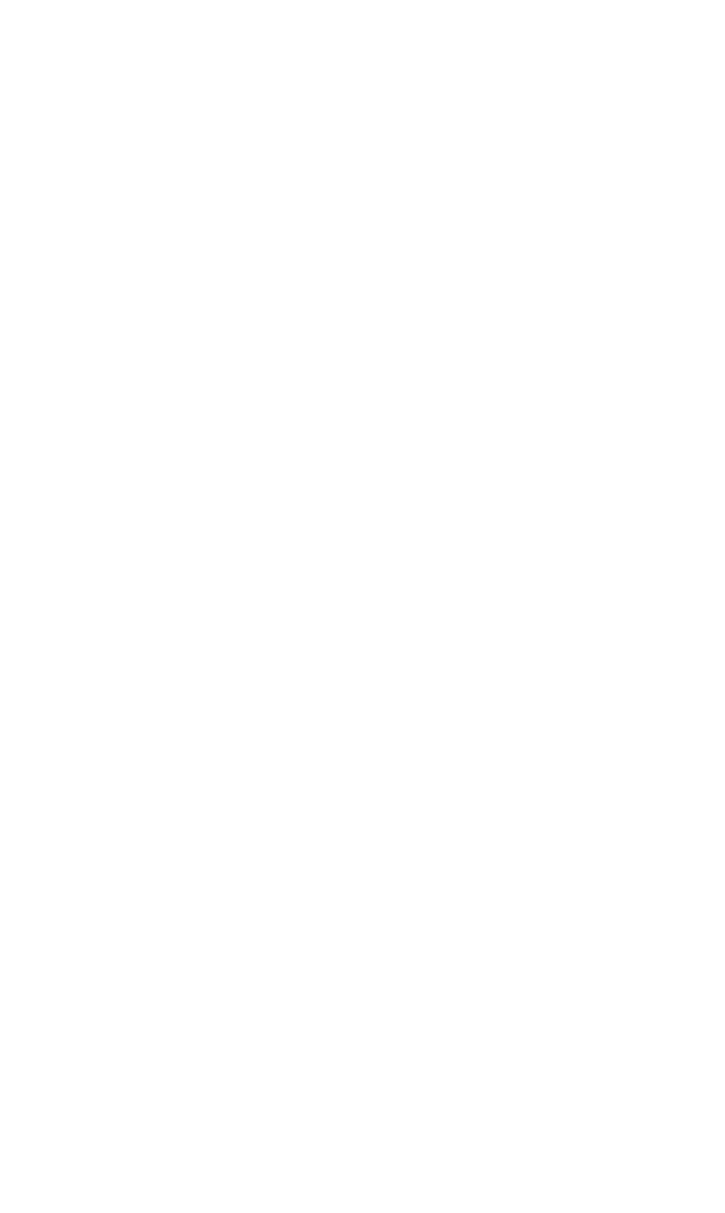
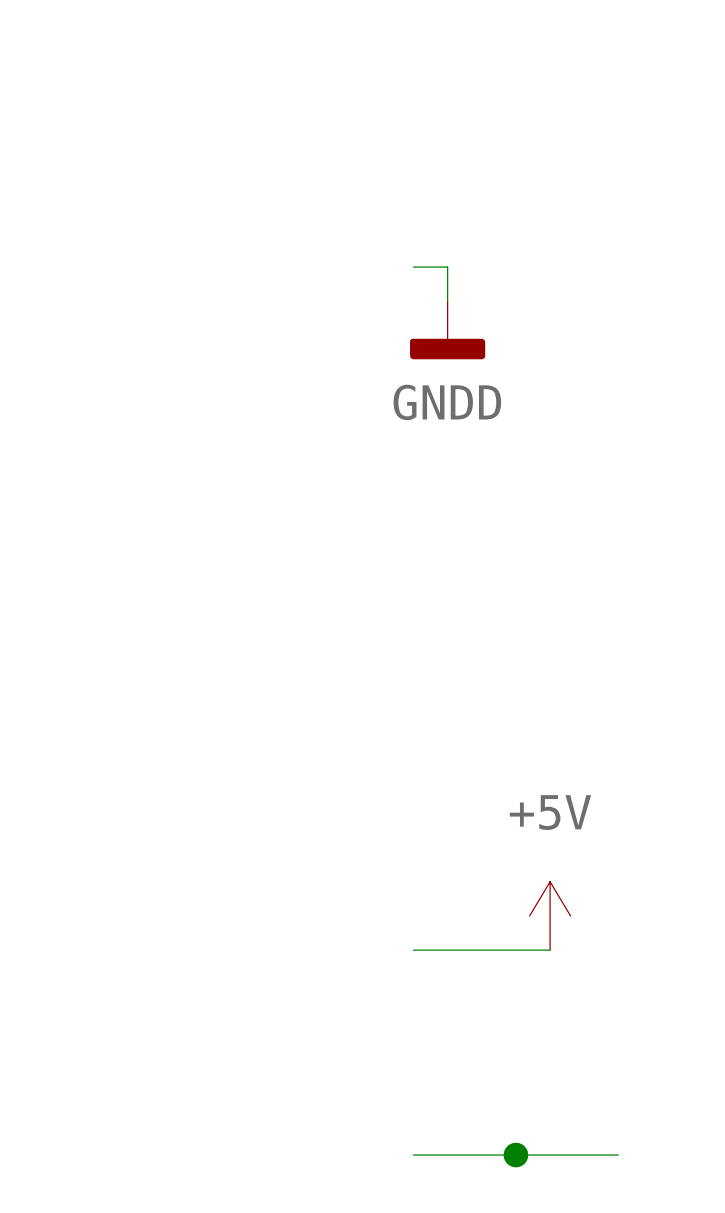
wire: none -> (413, 267) (447, 267) (447, 301)
power symbol: none -> GNDD (447, 330)
power symbol: none -> +5V (550, 915)
wire: none -> (413, 950) (550, 950)
wire: none -> (413, 1155) (618, 1155)
junction: none -> (515, 1155)

